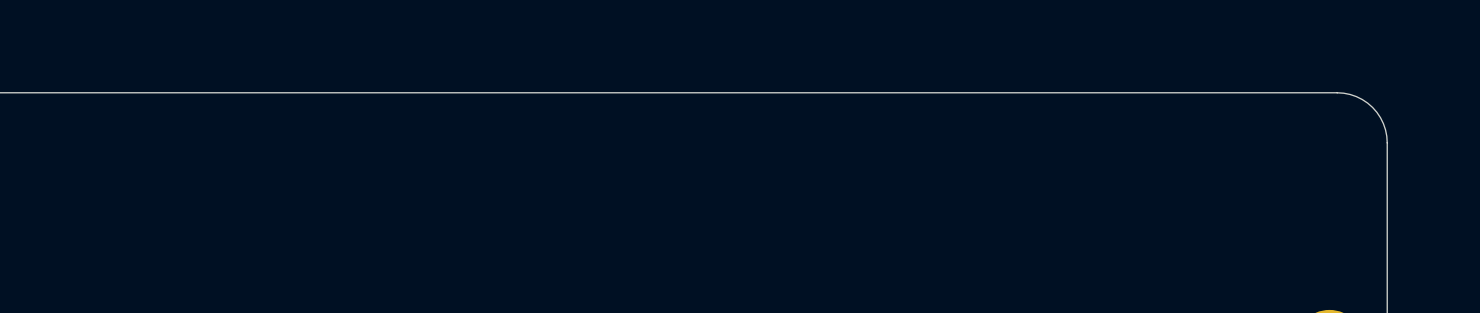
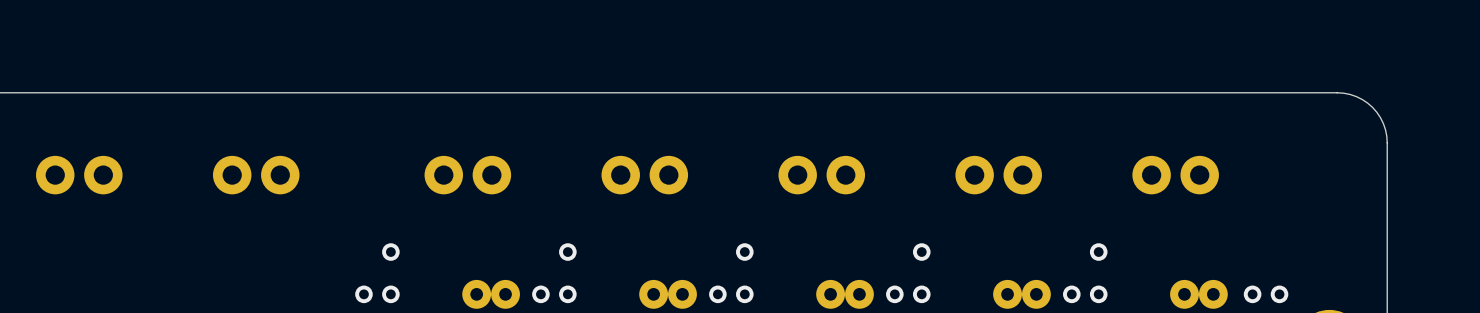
part: none -> (79, 175)
part: none -> (256, 175)
part: none -> (467, 175)
part: none -> (644, 175)
part: none -> (821, 175)
part: none -> (998, 175)
part: none -> (1175, 175)
via: none -> (390, 252)
via: none -> (567, 252)
via: none -> (744, 252)
via: none -> (921, 252)
via: none -> (1098, 252)
via: none -> (363, 294)
via: none -> (390, 294)
part: none -> (491, 294)
via: none -> (540, 294)
via: none -> (567, 294)
part: none -> (668, 294)
via: none -> (717, 294)
via: none -> (744, 294)
part: none -> (845, 294)
via: none -> (894, 294)
via: none -> (921, 294)
part: none -> (1021, 294)
via: none -> (1071, 294)
via: none -> (1098, 294)
part: none -> (1198, 294)
via: none -> (1252, 294)
via: none -> (1279, 294)

